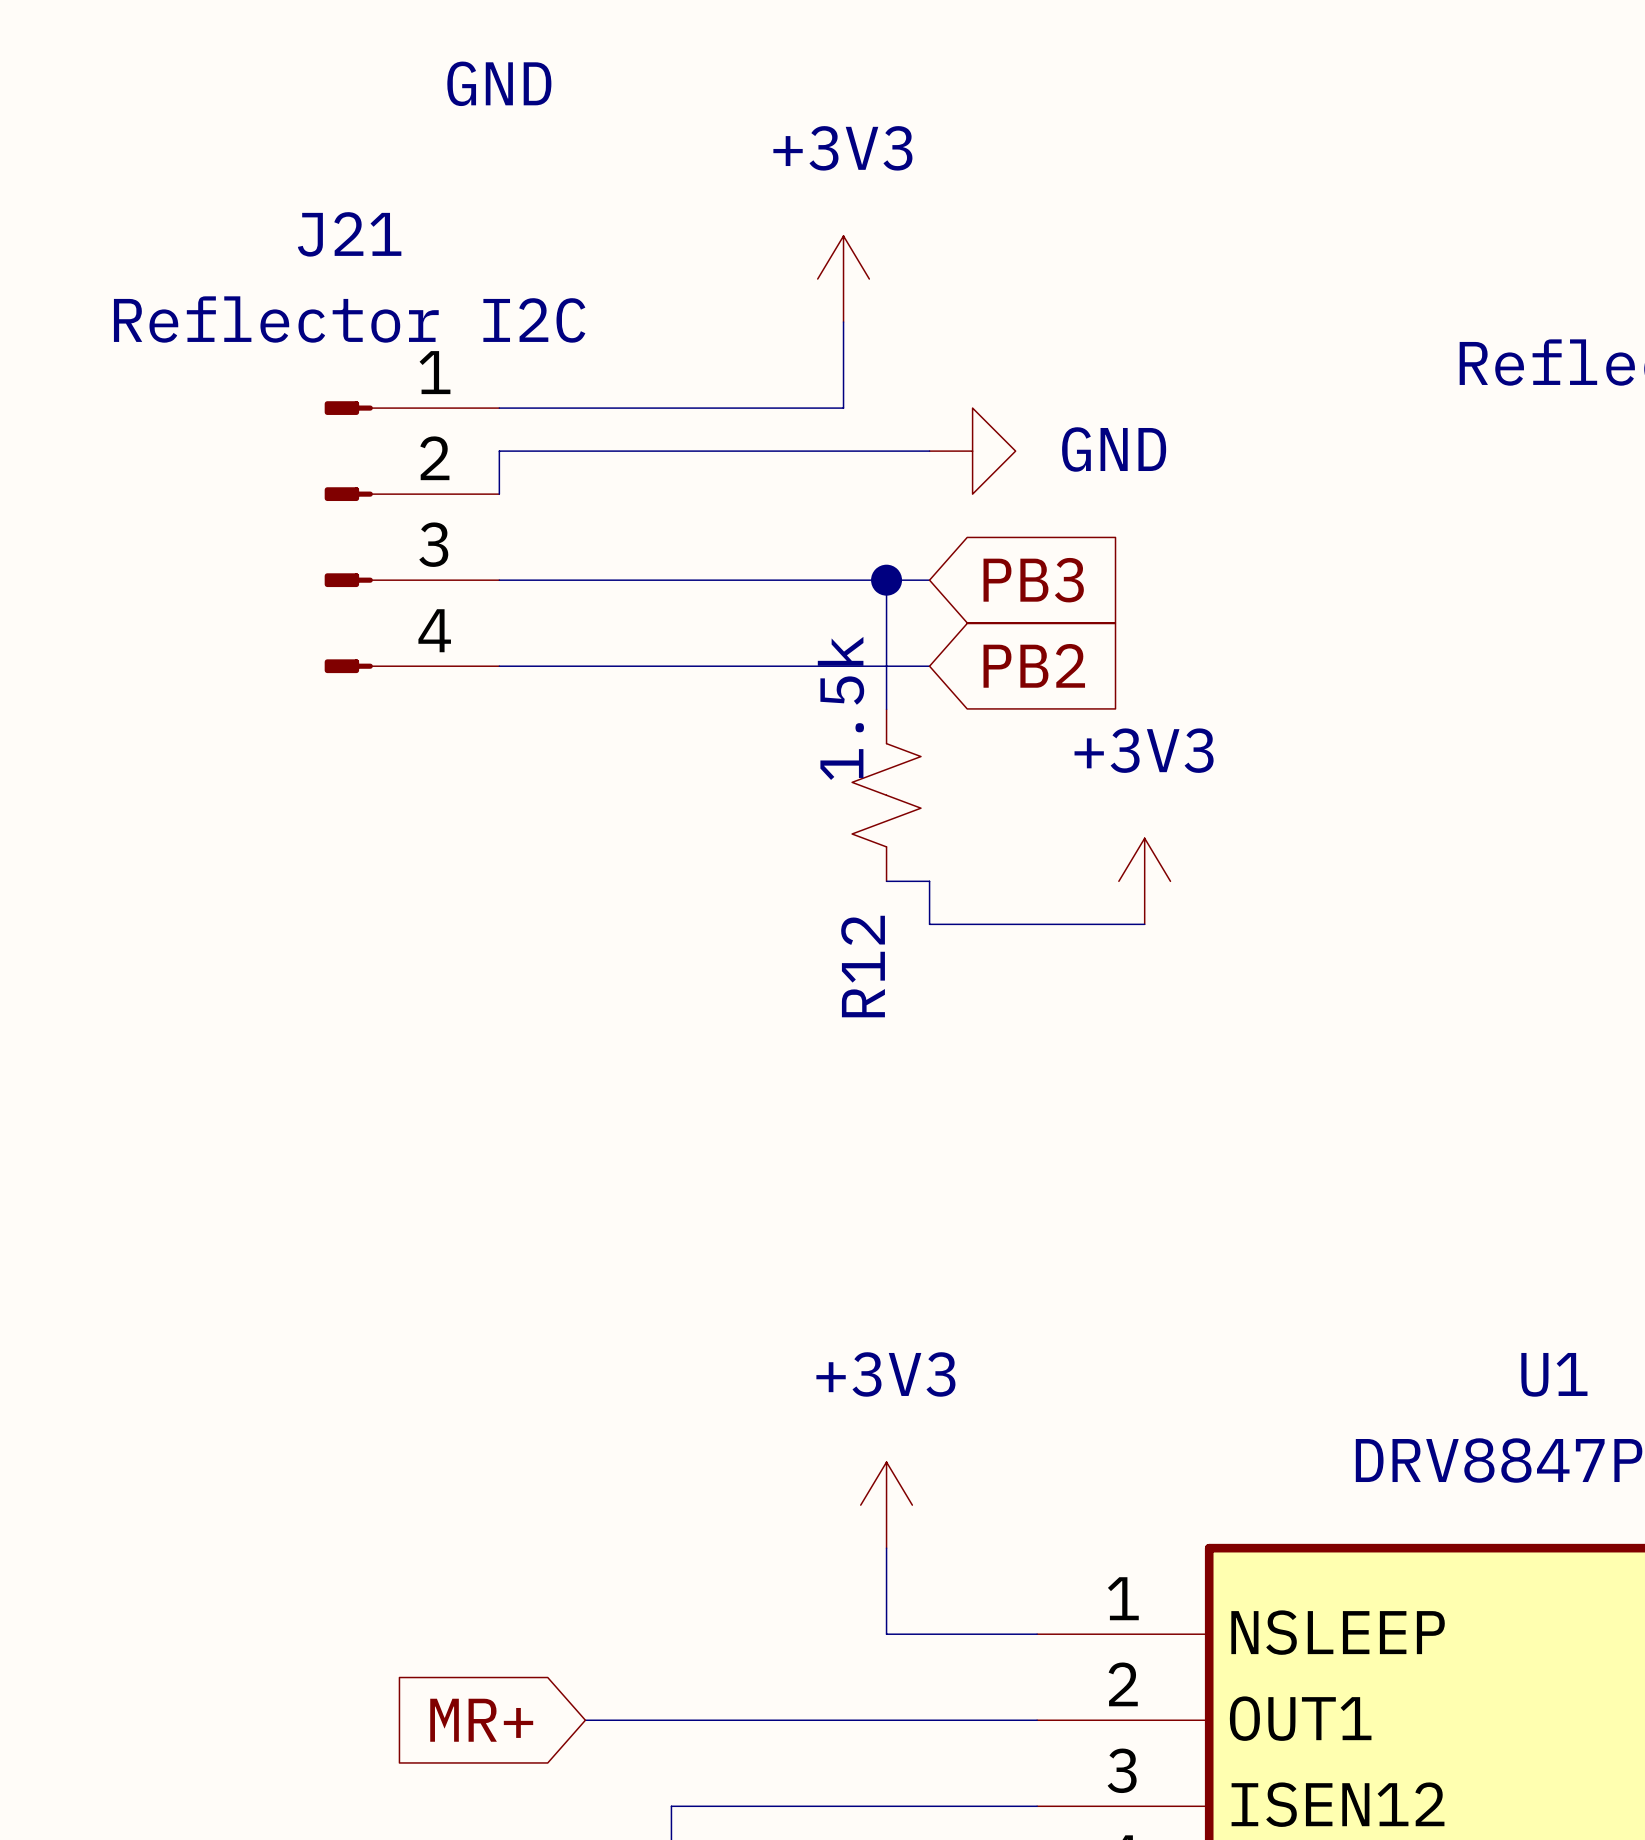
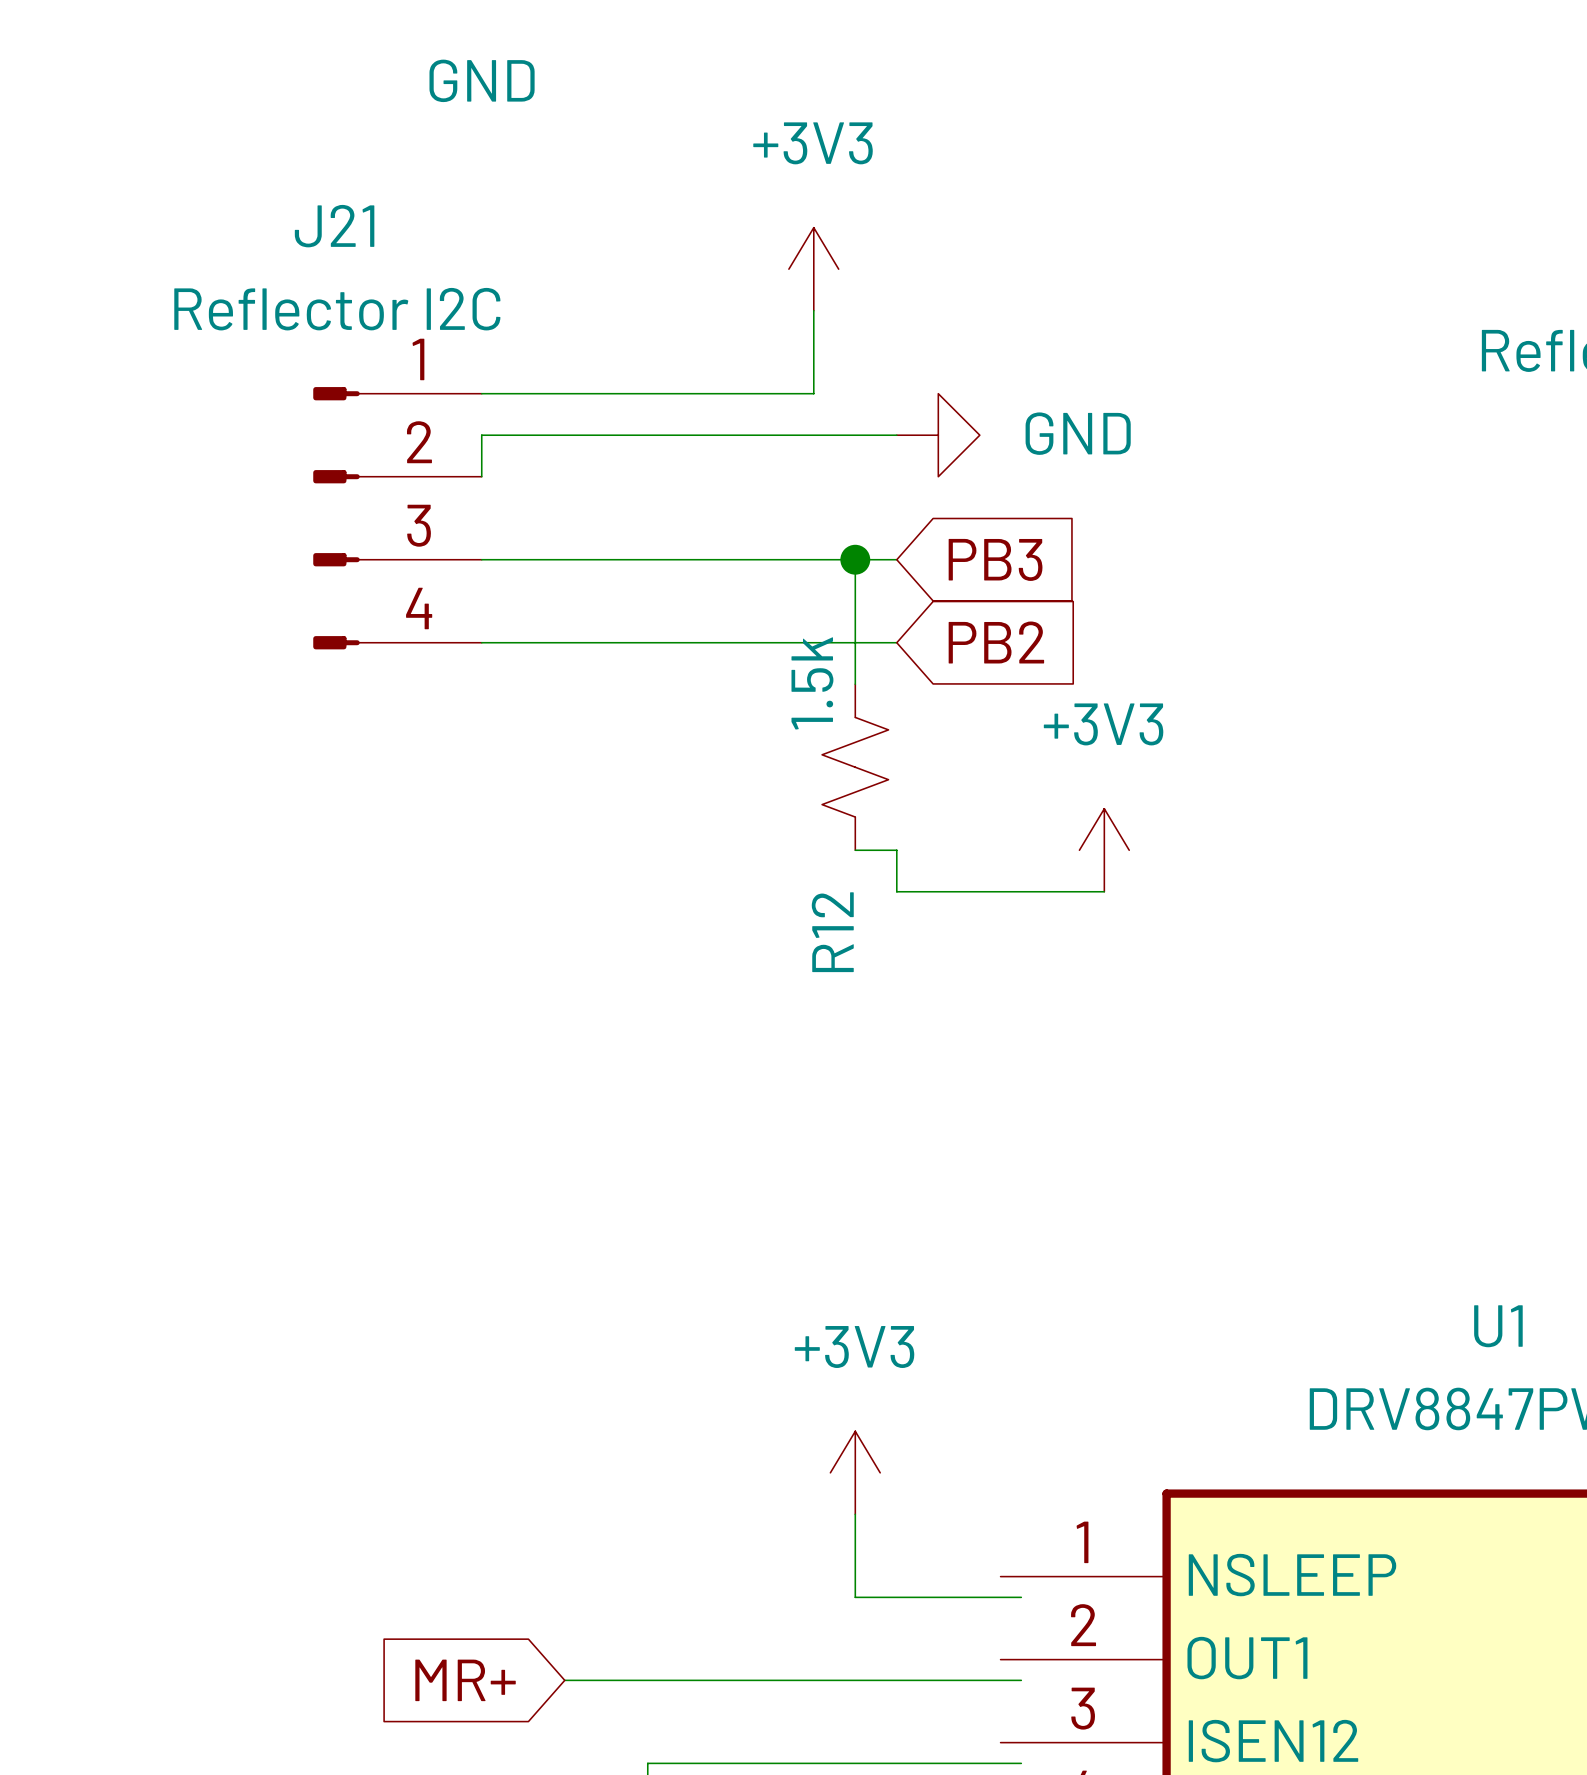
power symbol position: +3V3 (886, 1505) -> +3V3 (855, 1472)
wire: (886, 1634) (1037, 1634) -> (855, 1576) (855, 1597) (1021, 1597)
global label position: MR+ (481, 1720) -> MR+ (465, 1680)
wire: (585, 1720) (1037, 1720) -> none
wire: none -> (564, 1680) (1021, 1680)
wire: (1037, 1806) (671, 1806) (671, 1827) -> (1021, 1763) (647, 1763)

